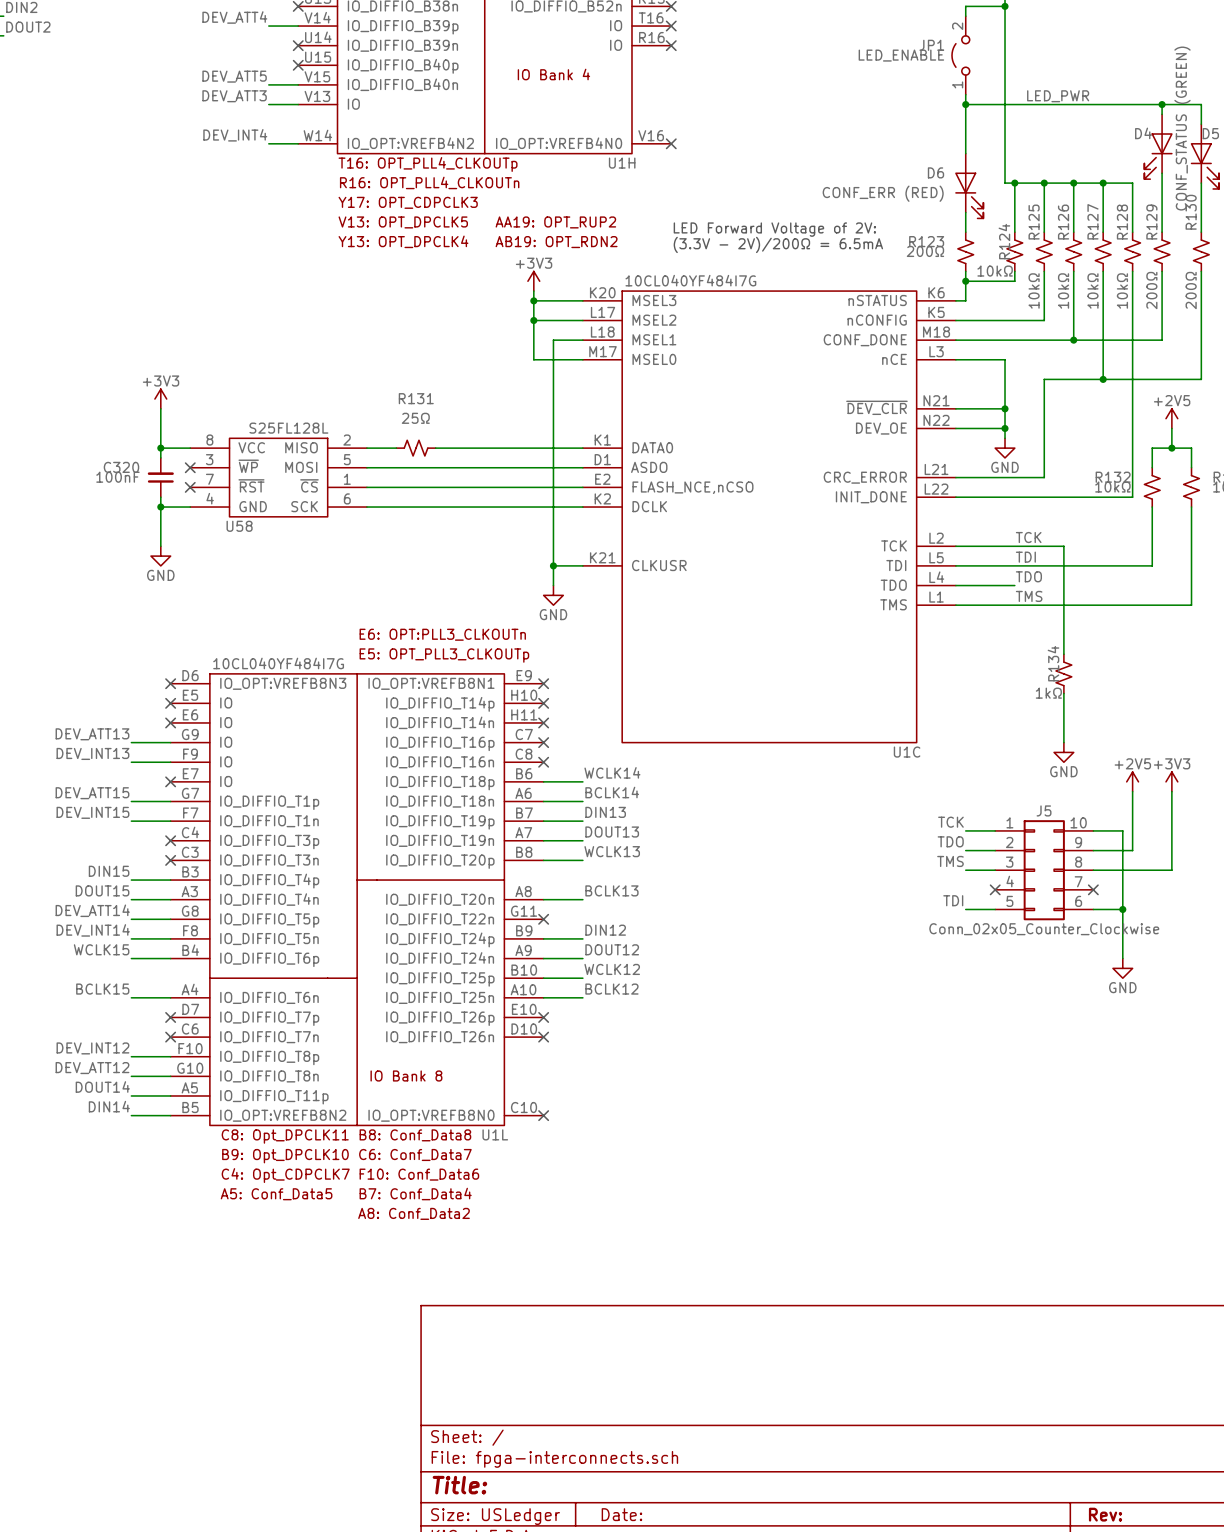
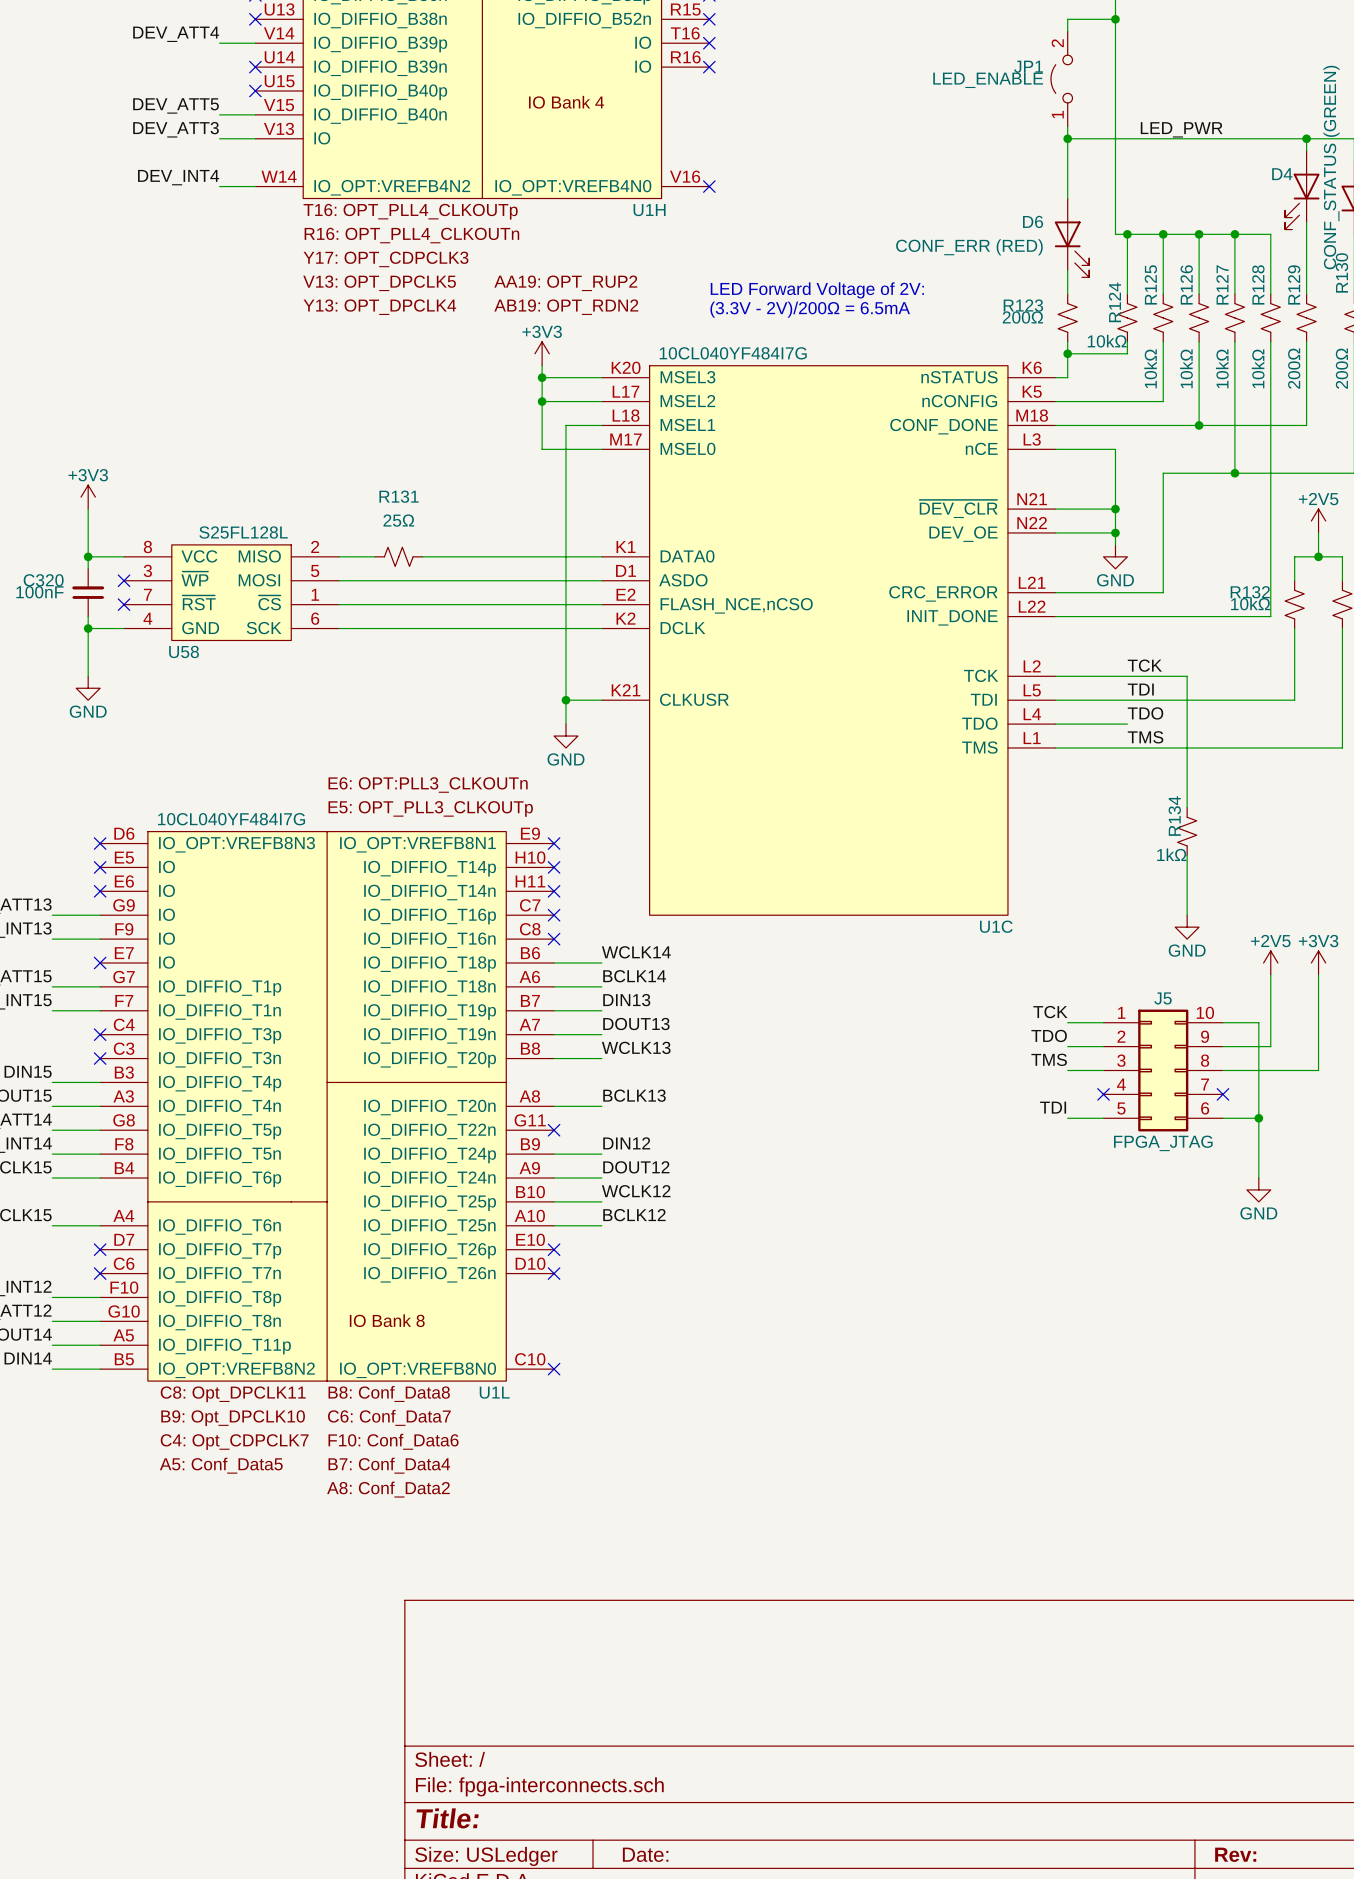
J5 value: Conn_02x05_Counter_Clockwise (1044, 929) -> FPGA_JTAG (1163, 1143)

